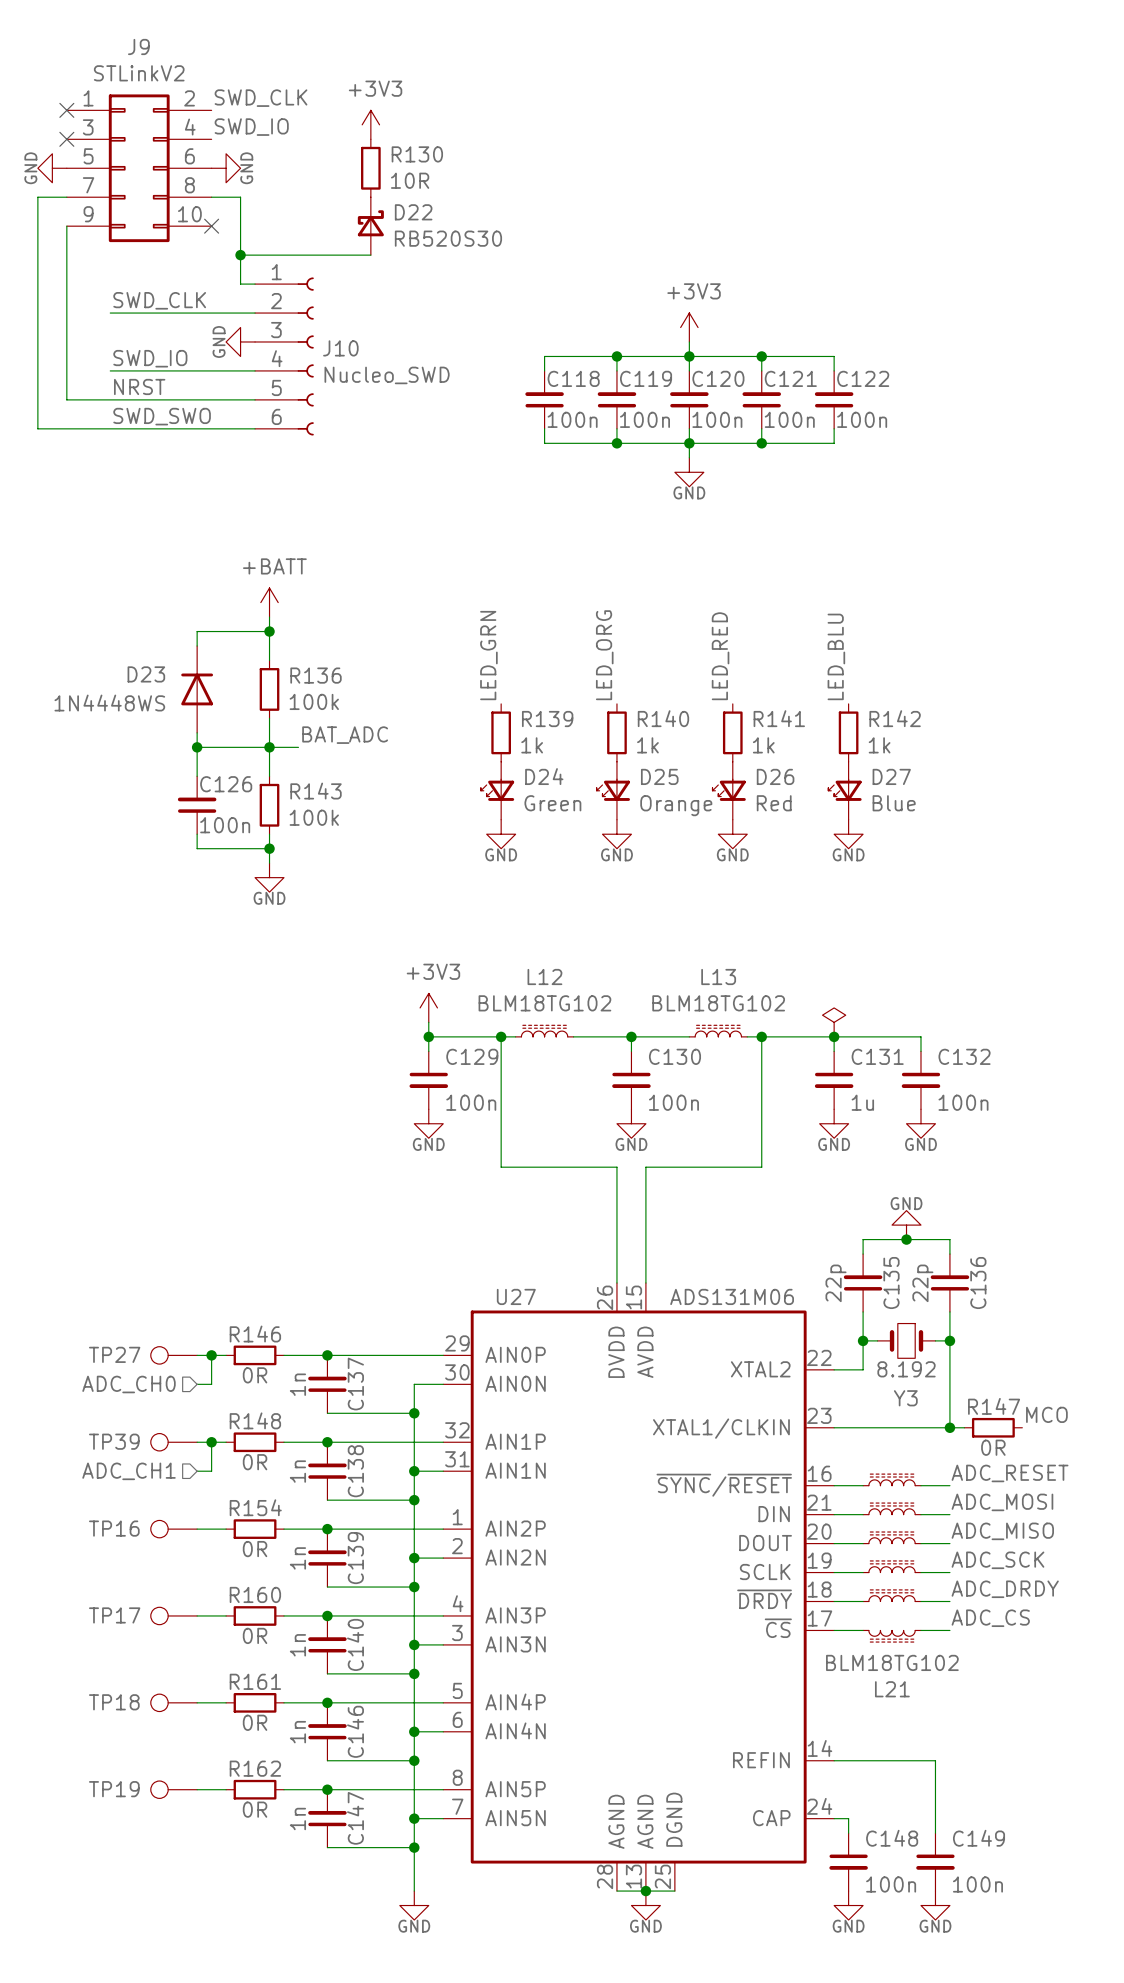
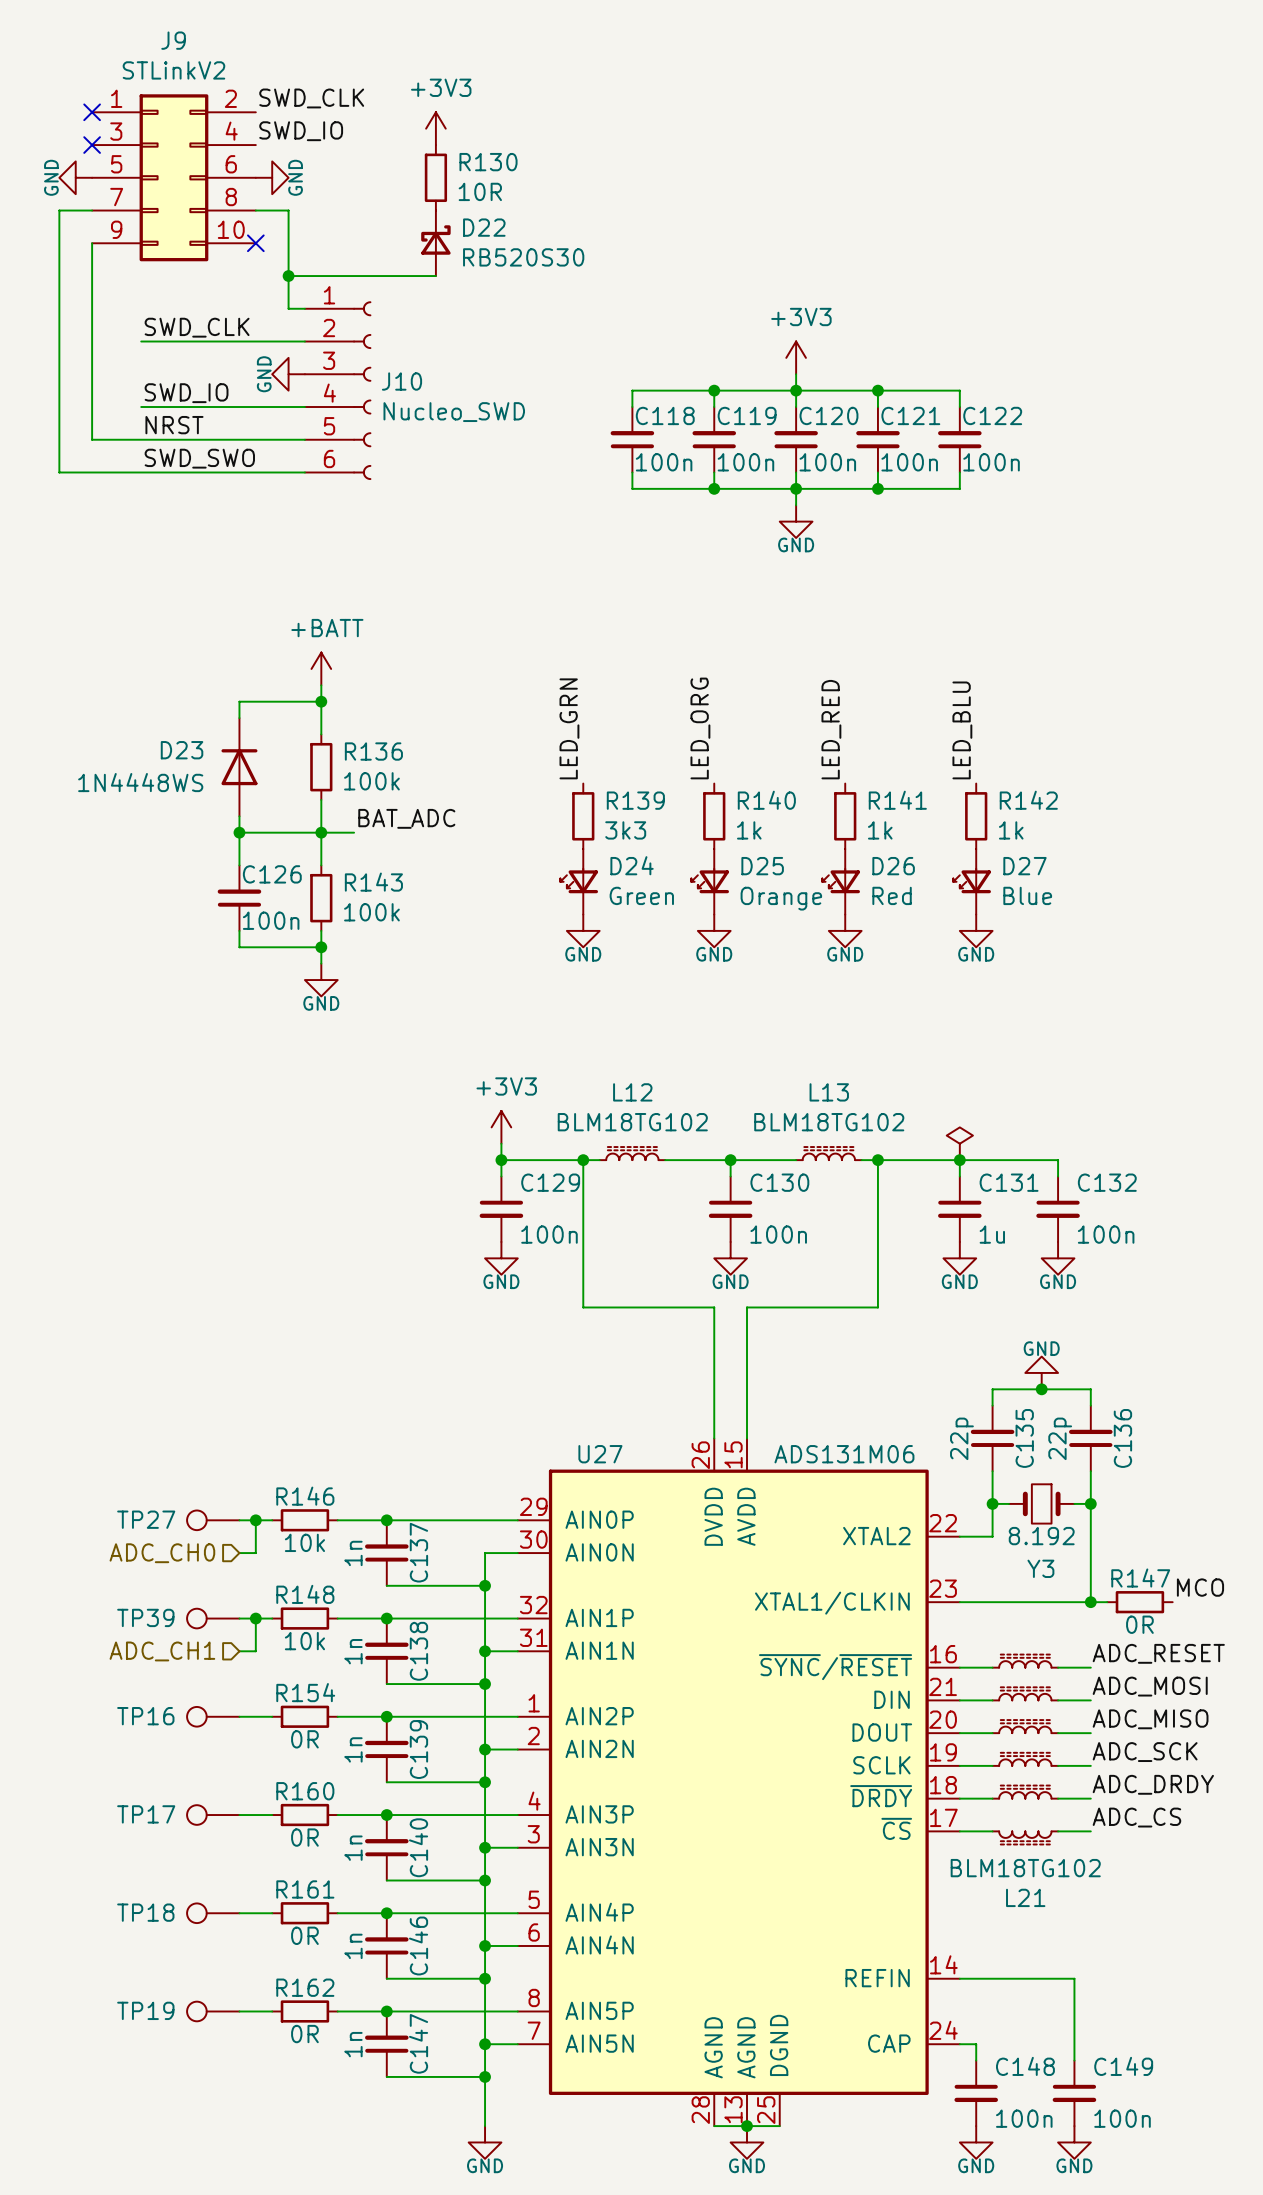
R139 value: 1k (532, 745) -> 3k3 (625, 830)
R146 value: 0R (255, 1375) -> 10k (304, 1542)
R148 value: 0R (255, 1462) -> 10k (304, 1641)

